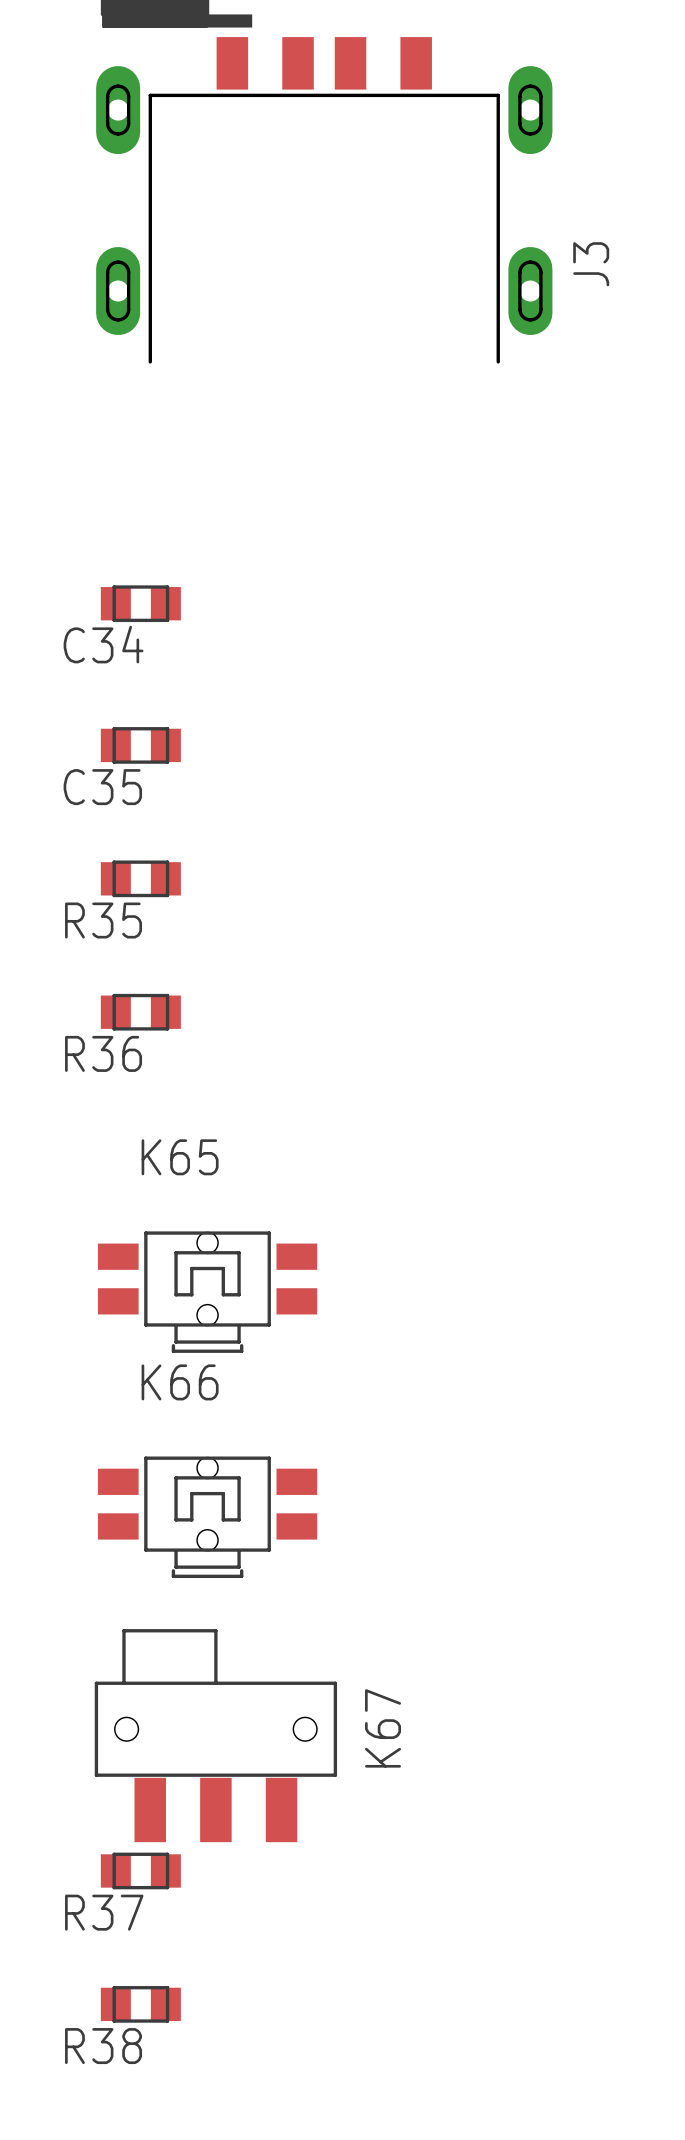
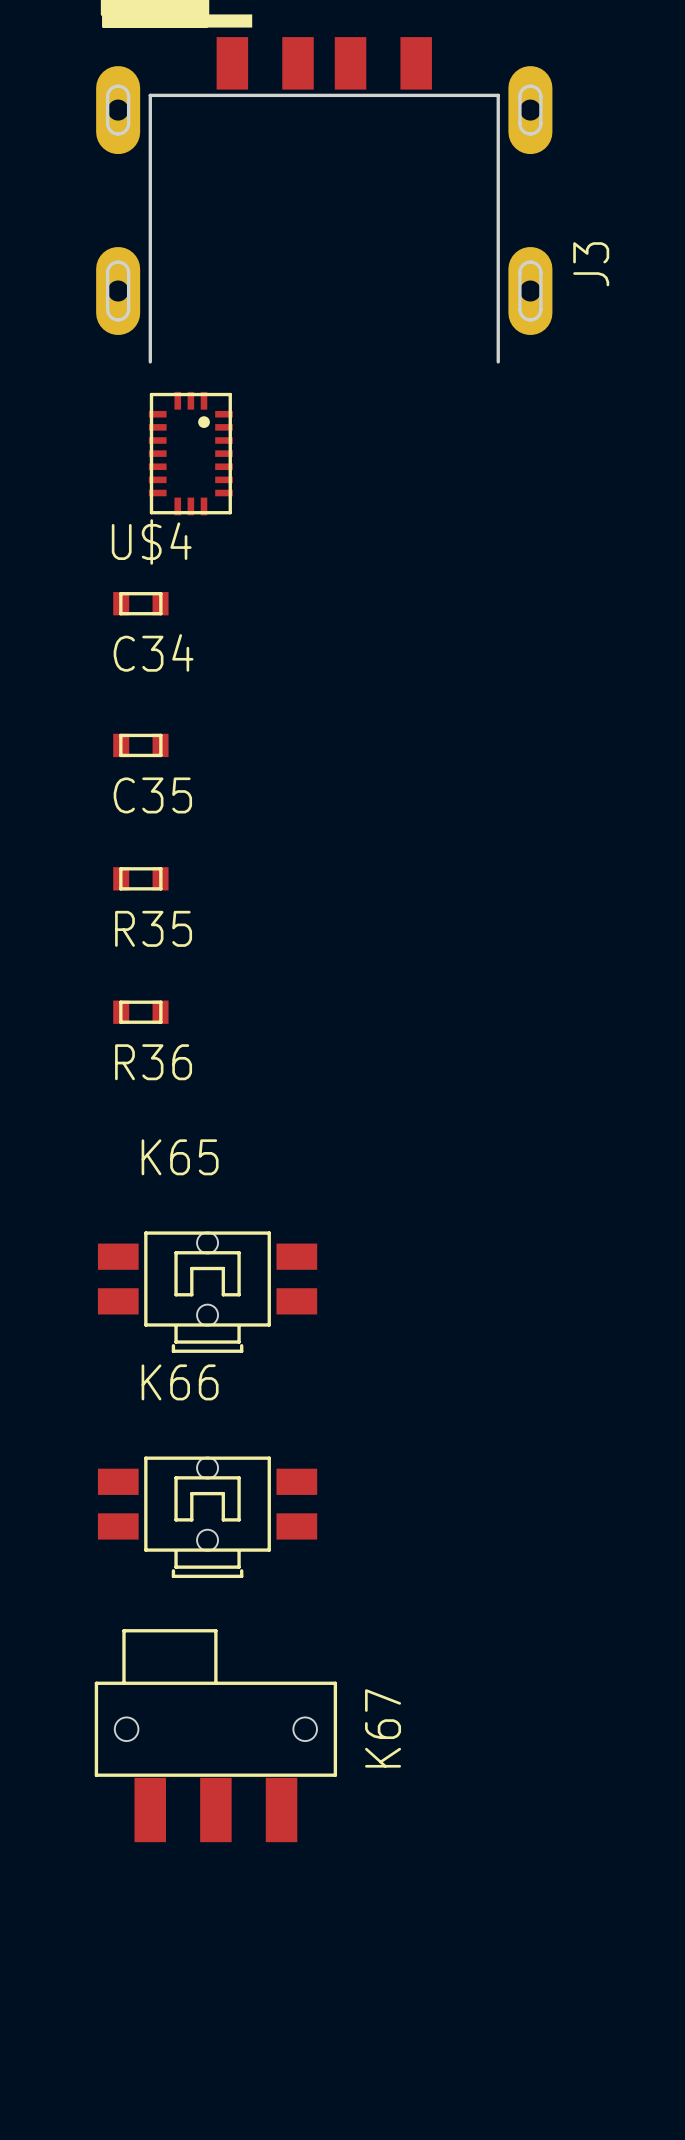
U$4: none -> (190, 453)
C34 footprint: [100, 585, 181, 623] -> [113, 592, 169, 616]
C34 name position: C34 (103, 644) -> C34 (153, 652)
C35 footprint: [100, 727, 181, 764] -> [113, 733, 169, 758]
C35 name position: C35 (102, 787) -> C35 (152, 795)
R35 footprint: [100, 860, 181, 898] -> [113, 867, 169, 891]
R35 name position: R35 (103, 920) -> R35 (153, 928)
R36 footprint: [100, 993, 181, 1031] -> [113, 1000, 169, 1024]
R36 name position: R36 (103, 1053) -> R36 (153, 1062)
R37: (140, 1870) -> none
R38: (140, 2004) -> none

